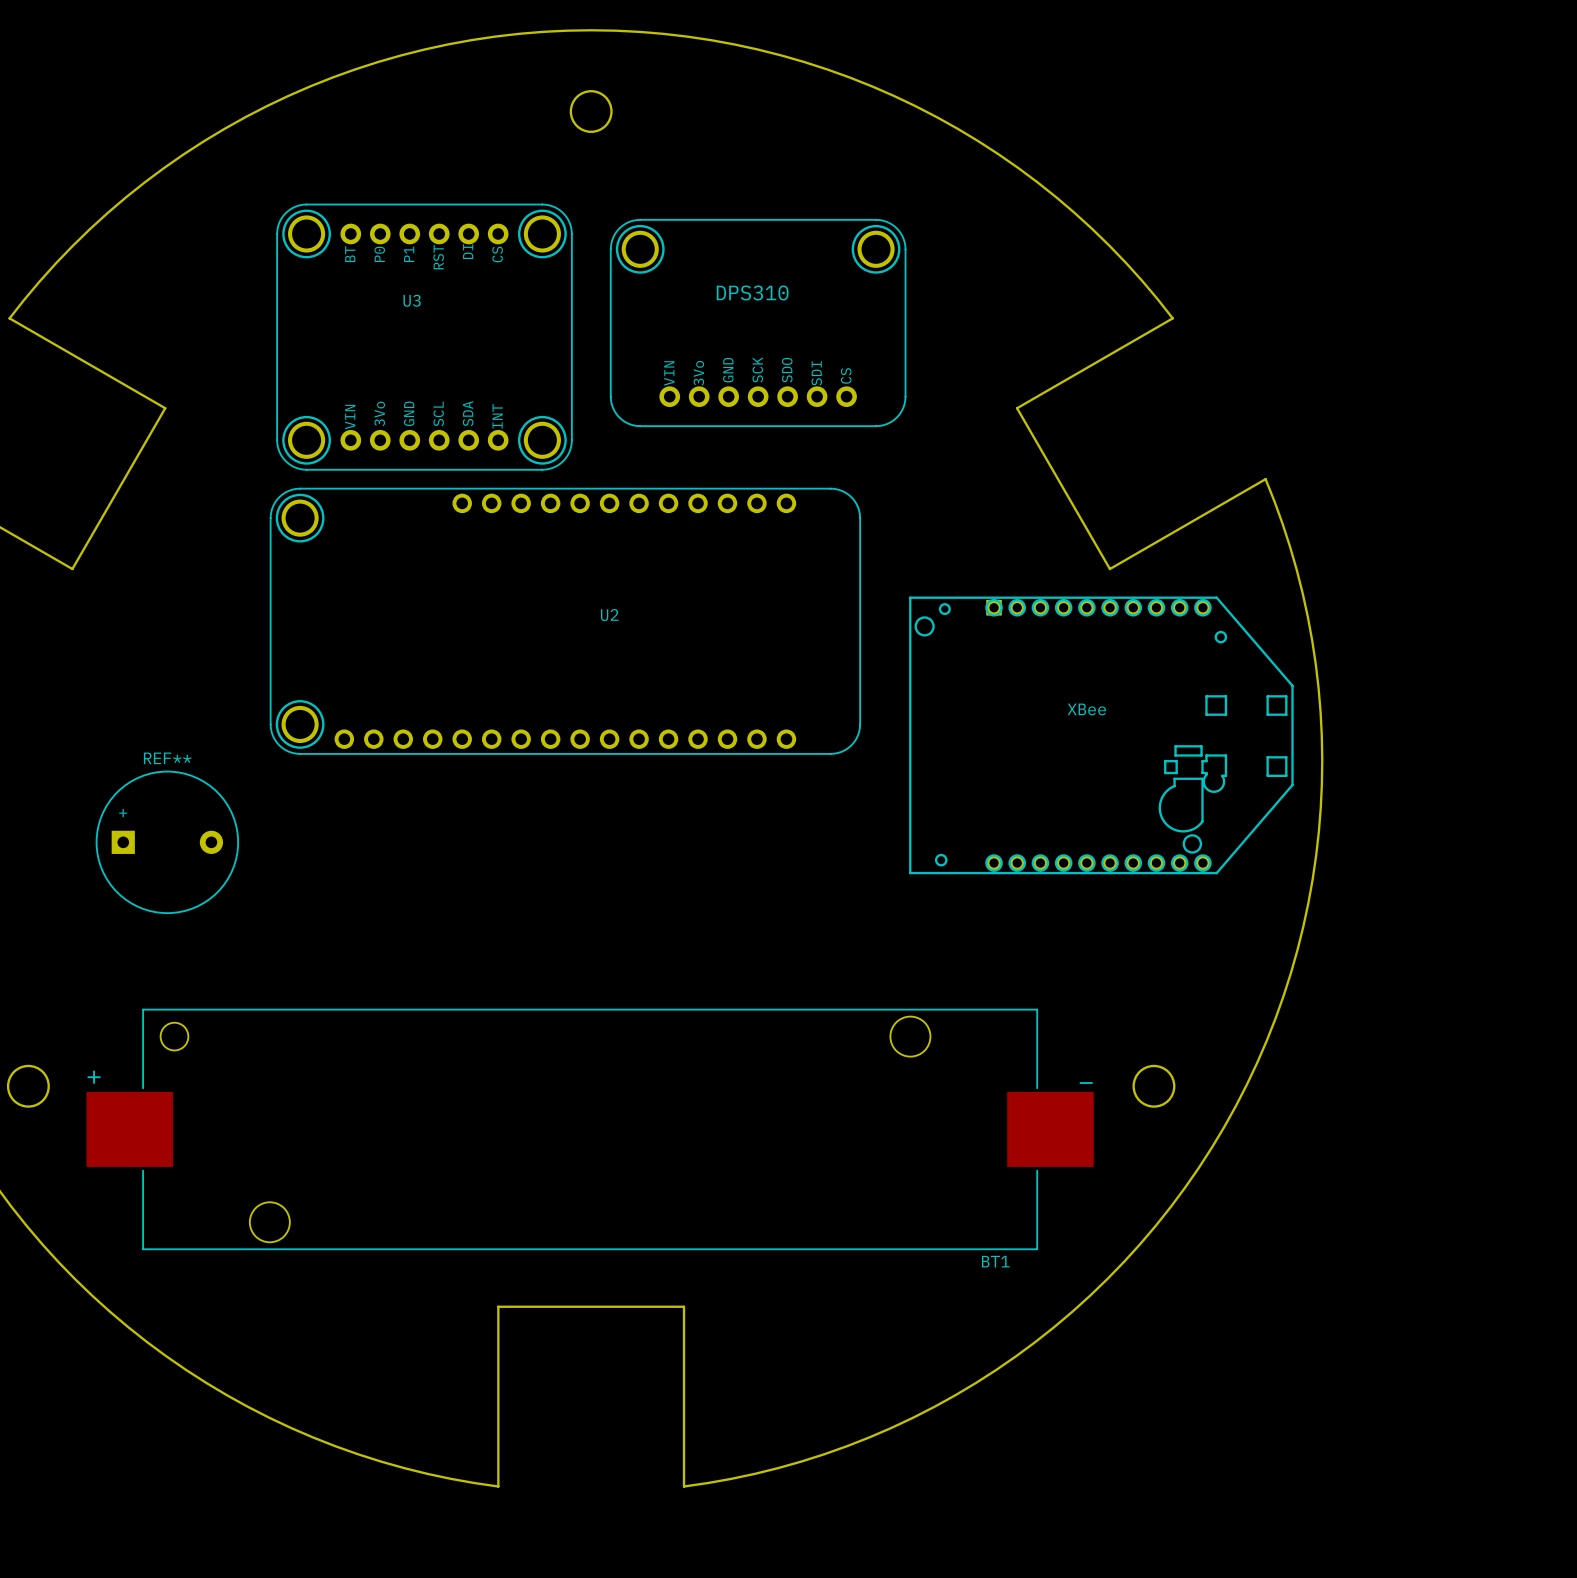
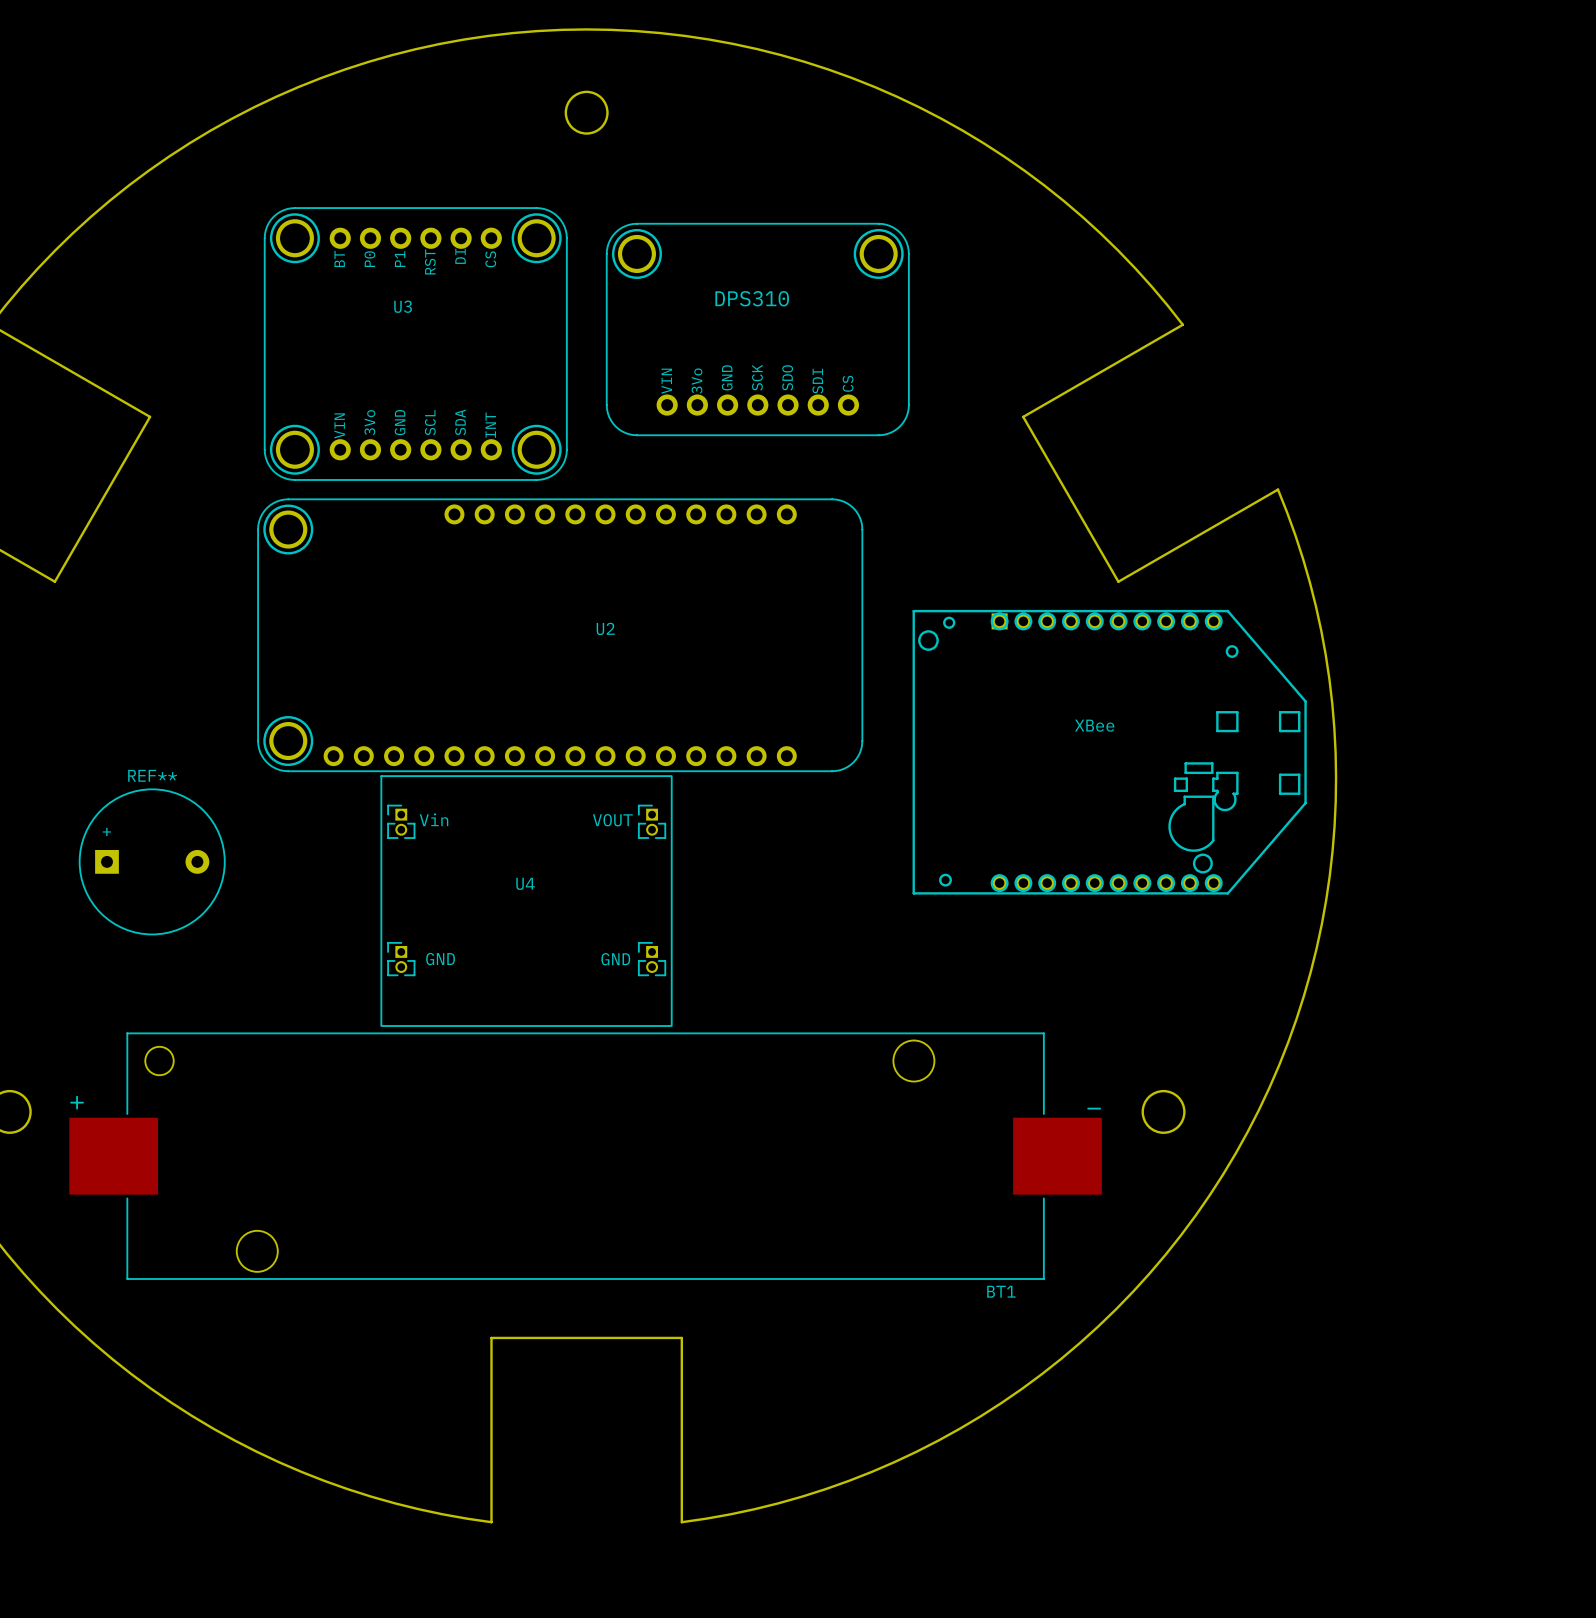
U4: none -> (526, 901)

